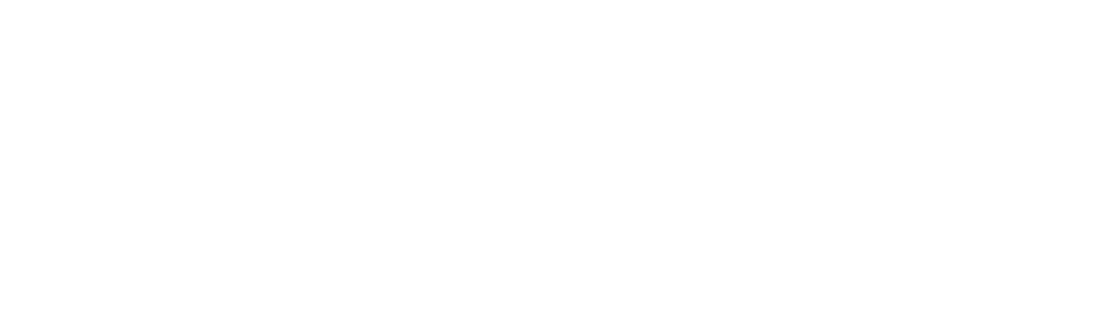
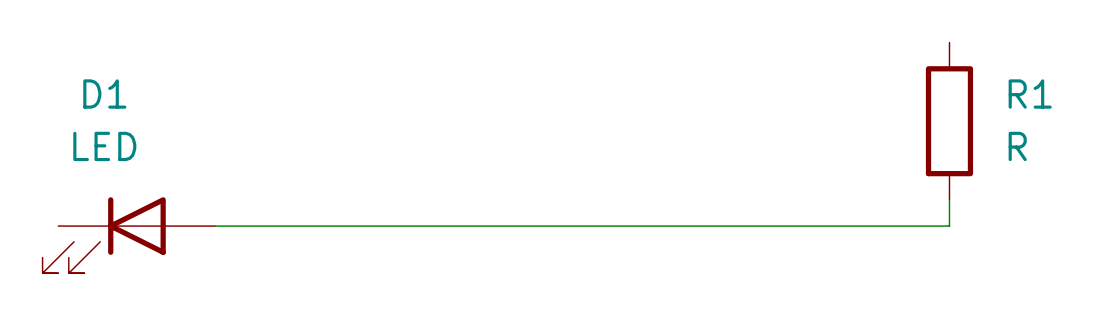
R1: none -> R (949, 121)
wire: none -> (949, 199) (949, 226) (215, 226)
D1: none -> LED (129, 235)

